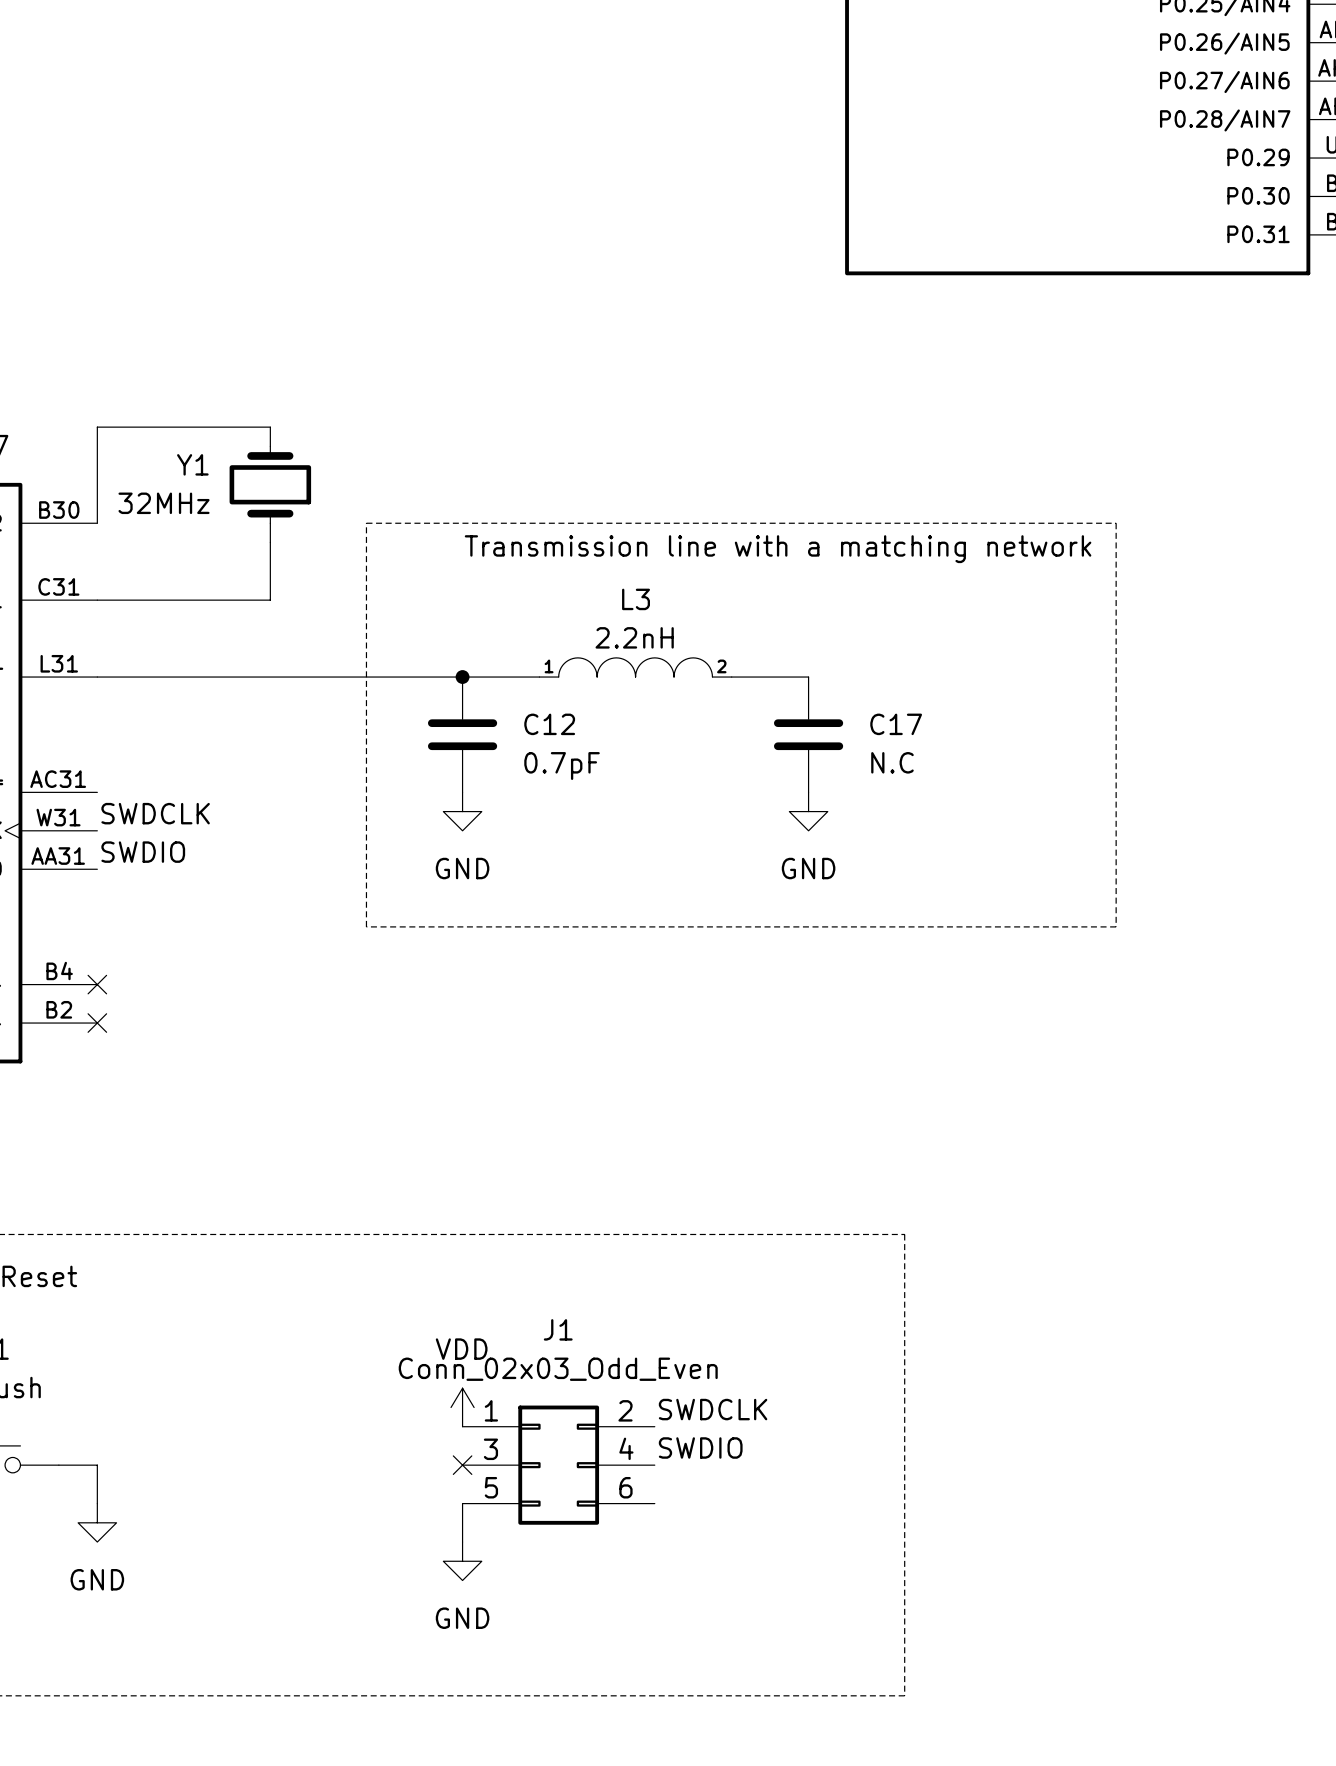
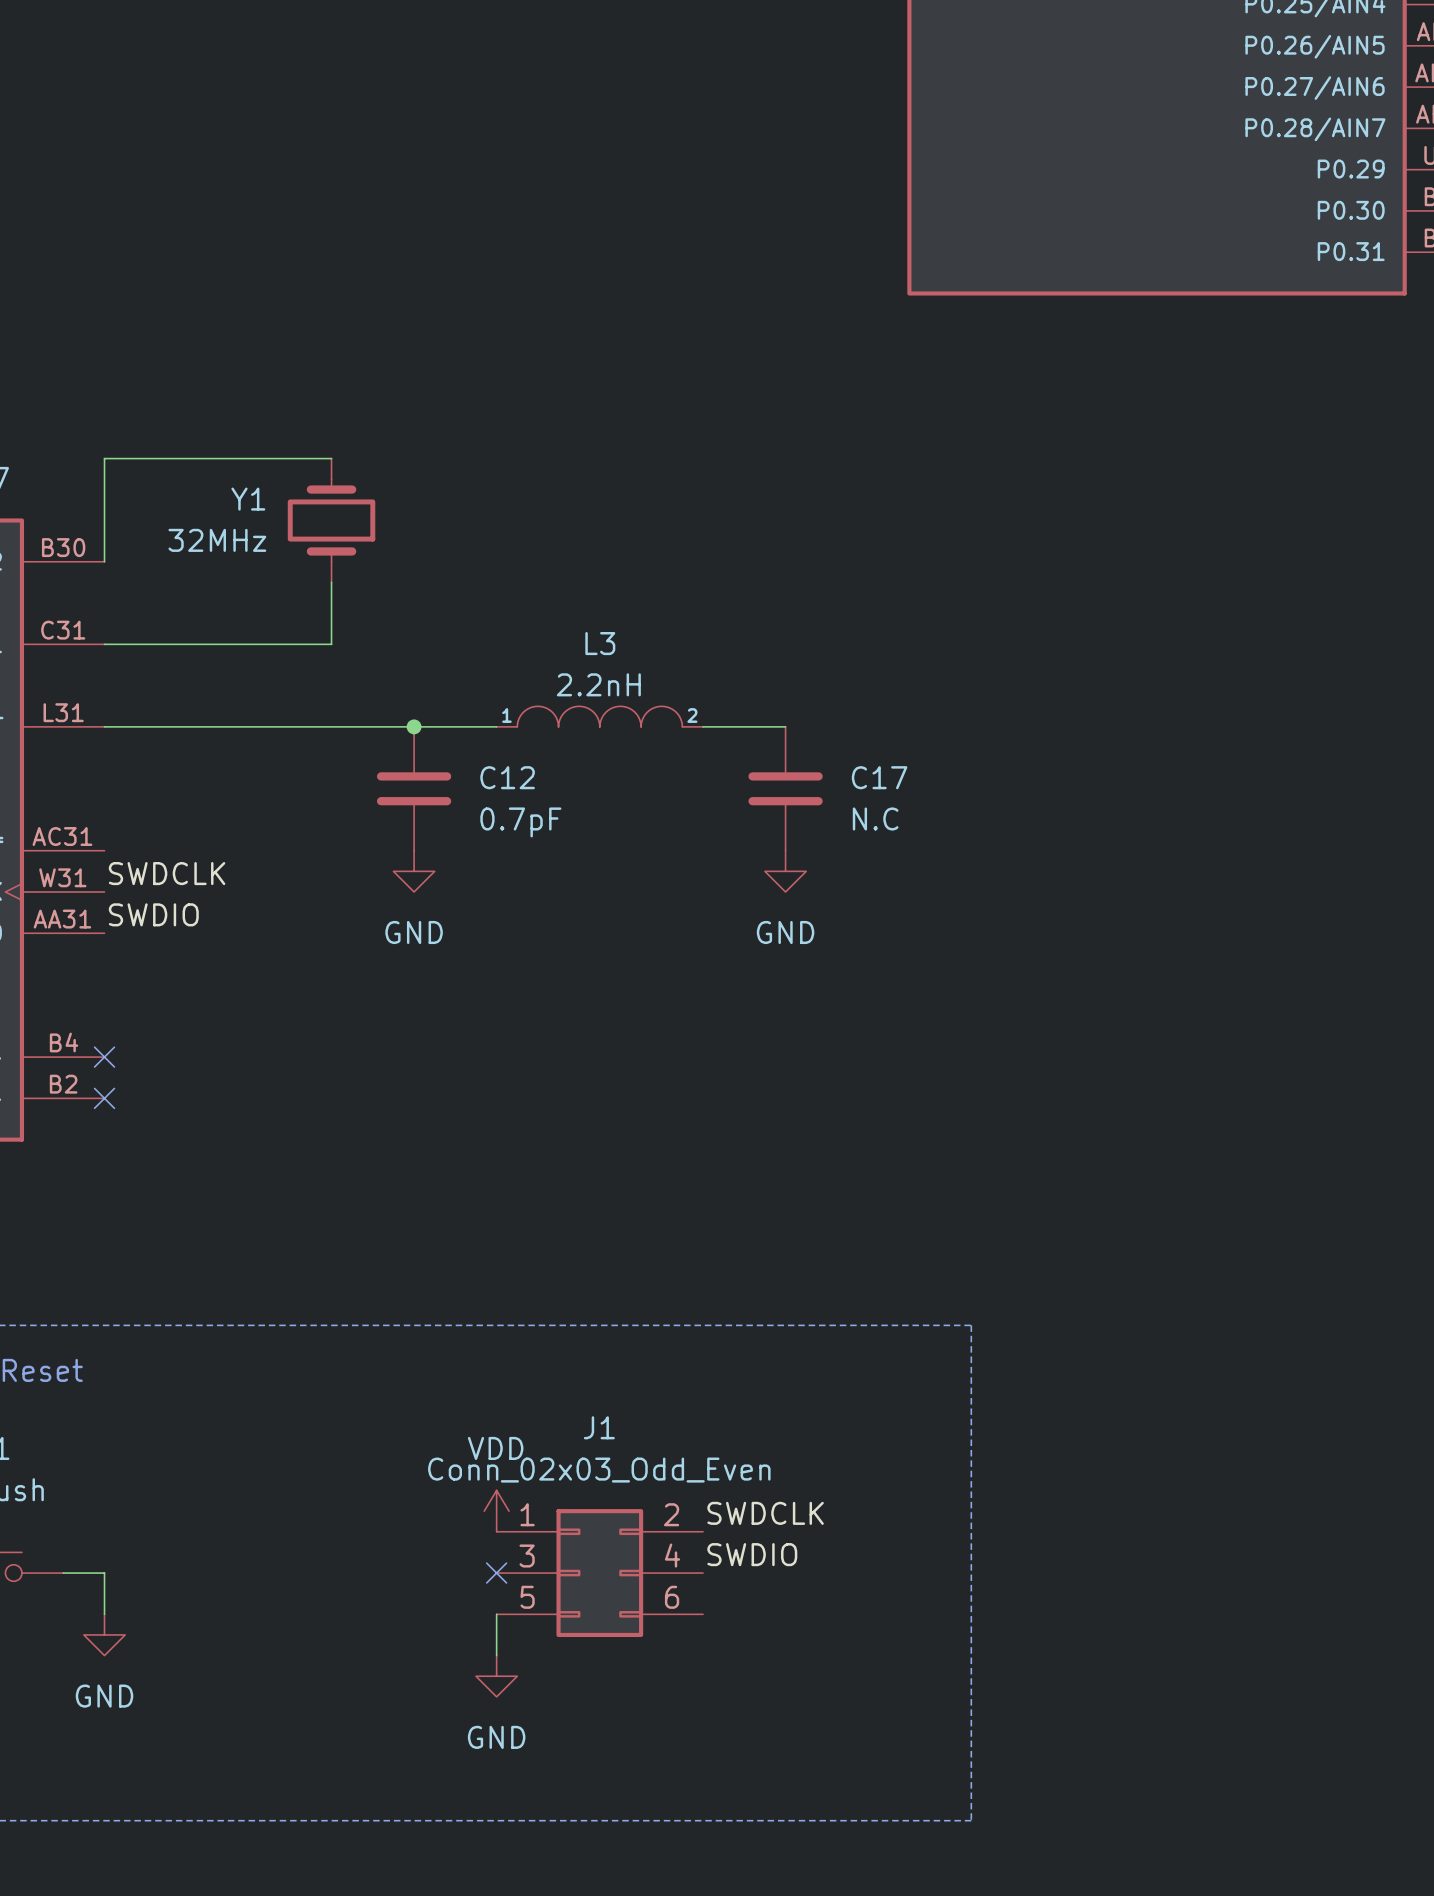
wire: none -> (290, 458) (331, 458)
Y1 position: (270, 484) -> (331, 520)
line: (366, 523) (1116, 523) (1116, 926) (366, 926) (366, 523) -> none
wire: (270, 542) (270, 600) -> (331, 582) (331, 644) (290, 644)
text: Transmission line with a matching network (778, 549) -> none
L3 position: (635, 667) -> (599, 716)
wire: (462, 677) (539, 677) -> none
junction position: (462, 677) -> (414, 726)
wire: (731, 677) (808, 677) -> (785, 726) (703, 726)
C12 position: (462, 734) -> (414, 788)
C17 position: (808, 734) -> (785, 788)
power symbol position: GND (462, 811) -> GND (414, 871)
power symbol position: GND (808, 811) -> GND (785, 871)

